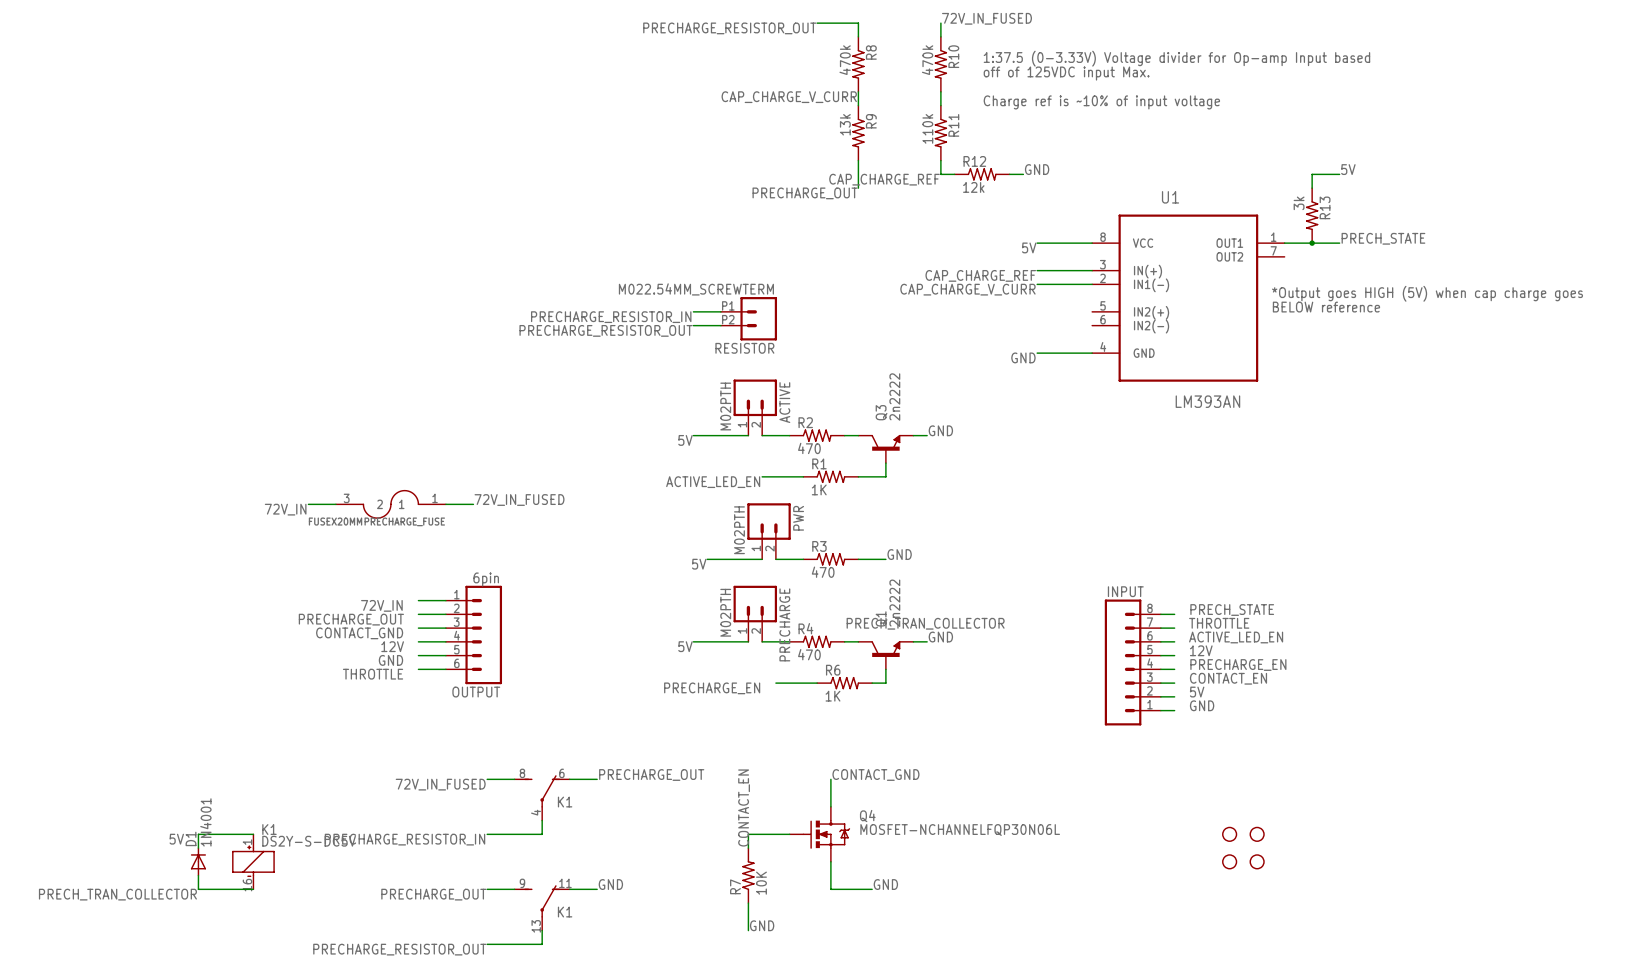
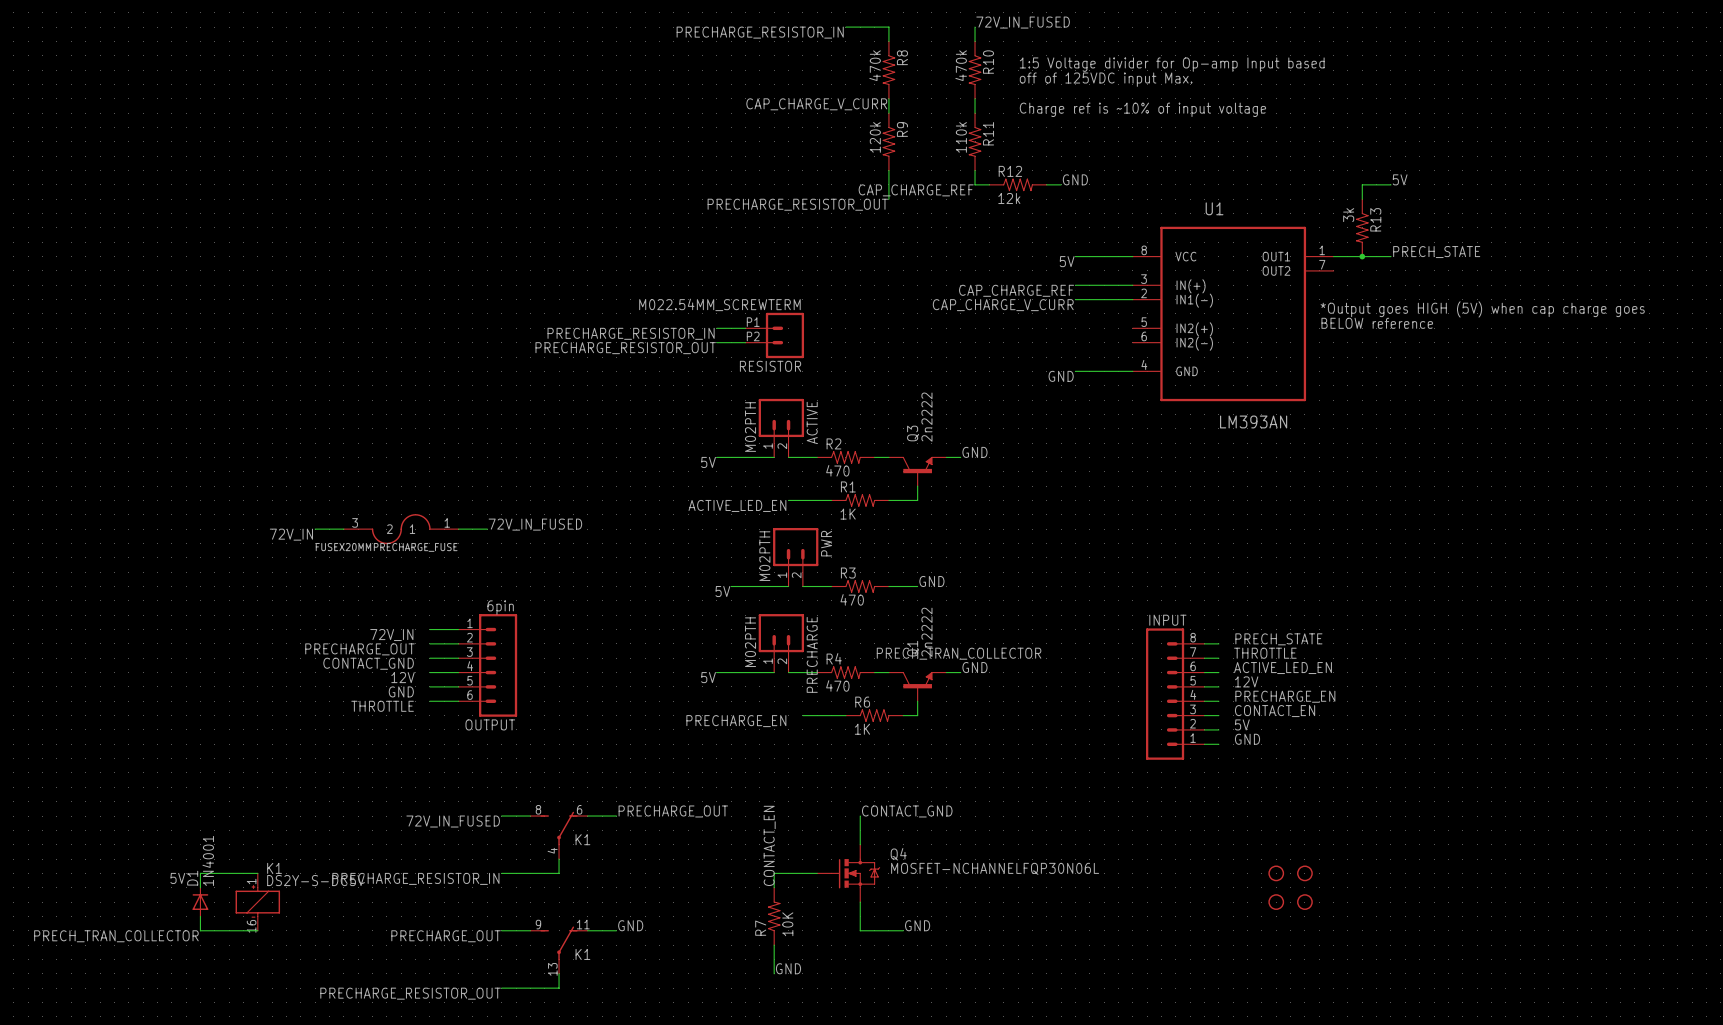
label: PRECHARGE_RESISTOR_OUT (729, 28) -> PRECHARGE_RESISTOR_IN (760, 32)
text: 1:37.5 (0-3.33V) Voltage divider for Op-amp Input based (1176, 58) -> 1:5 Voltage divider for Op-amp Input based (1172, 64)
R9 value: 13k (845, 124) -> 120k (875, 137)
label: PRECHARGE_OUT (805, 193) -> PRECHARGE_RESISTOR_OUT (797, 204)

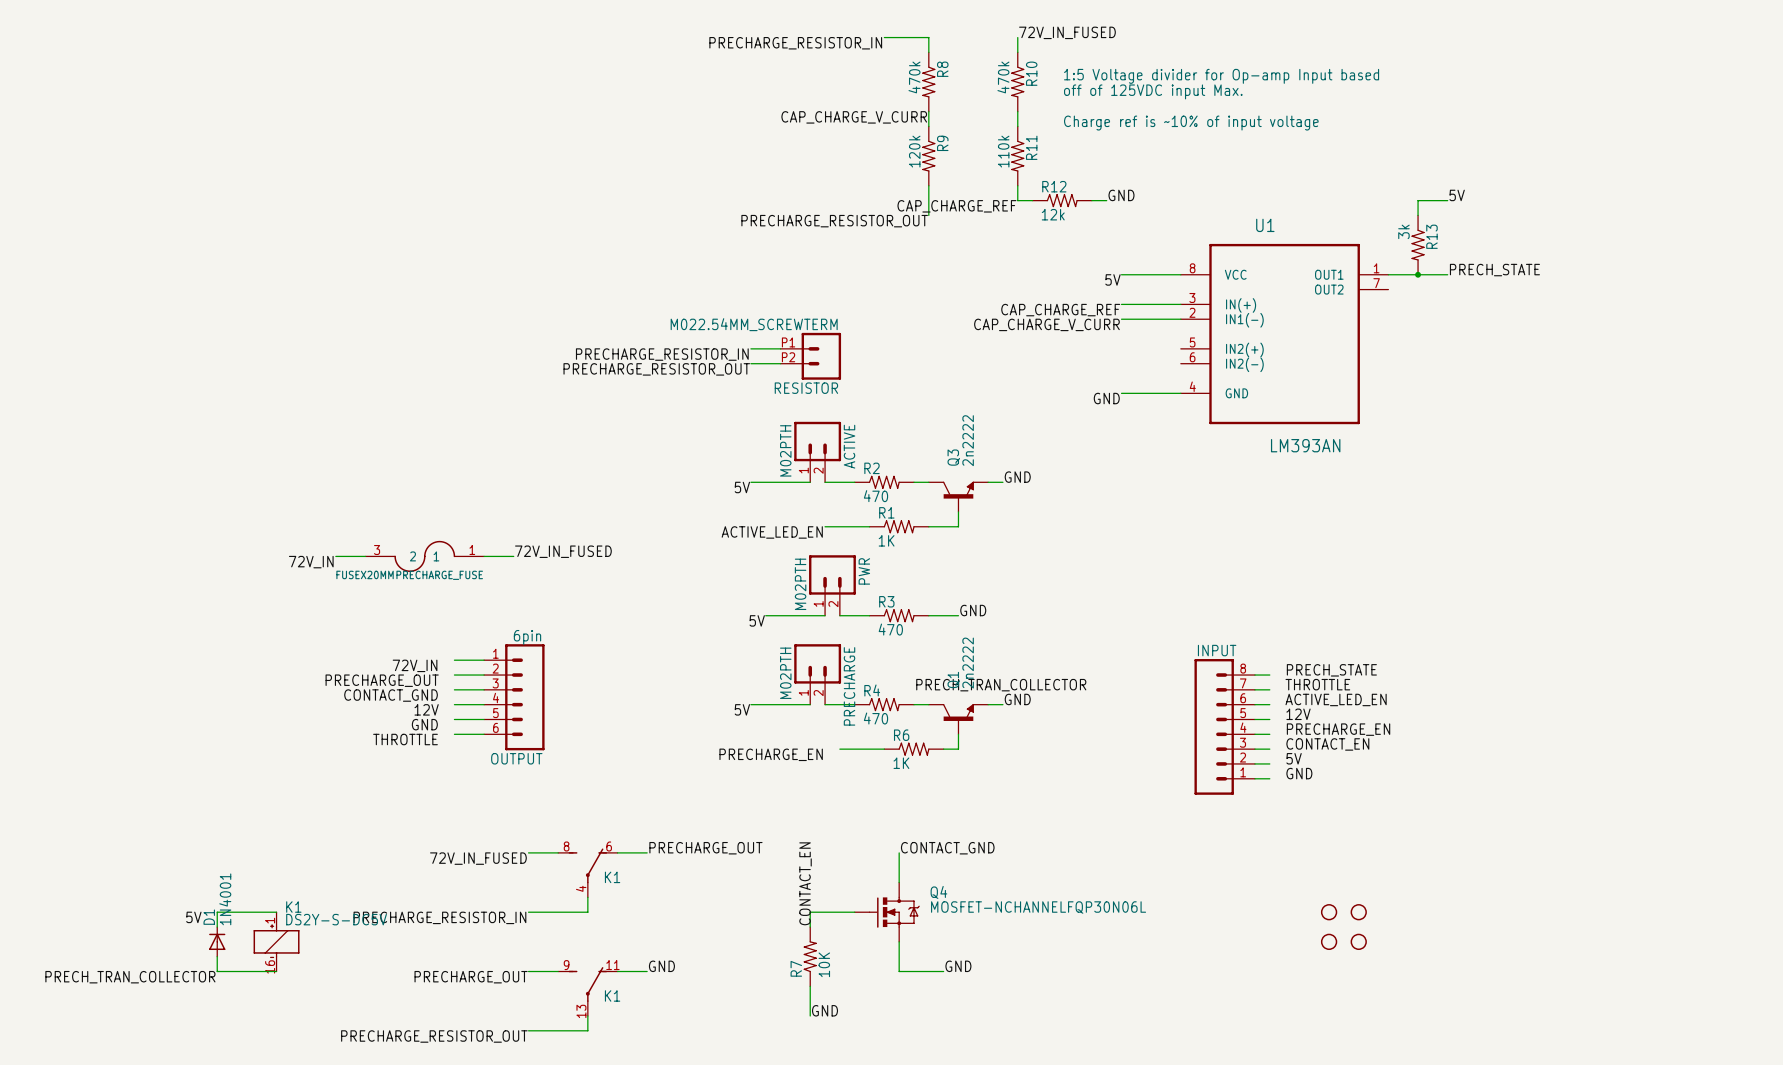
text: *Output goes HIGH (5V) when cap charge goes (1482, 309) -> none
text: BELOW reference (1377, 323) -> none

